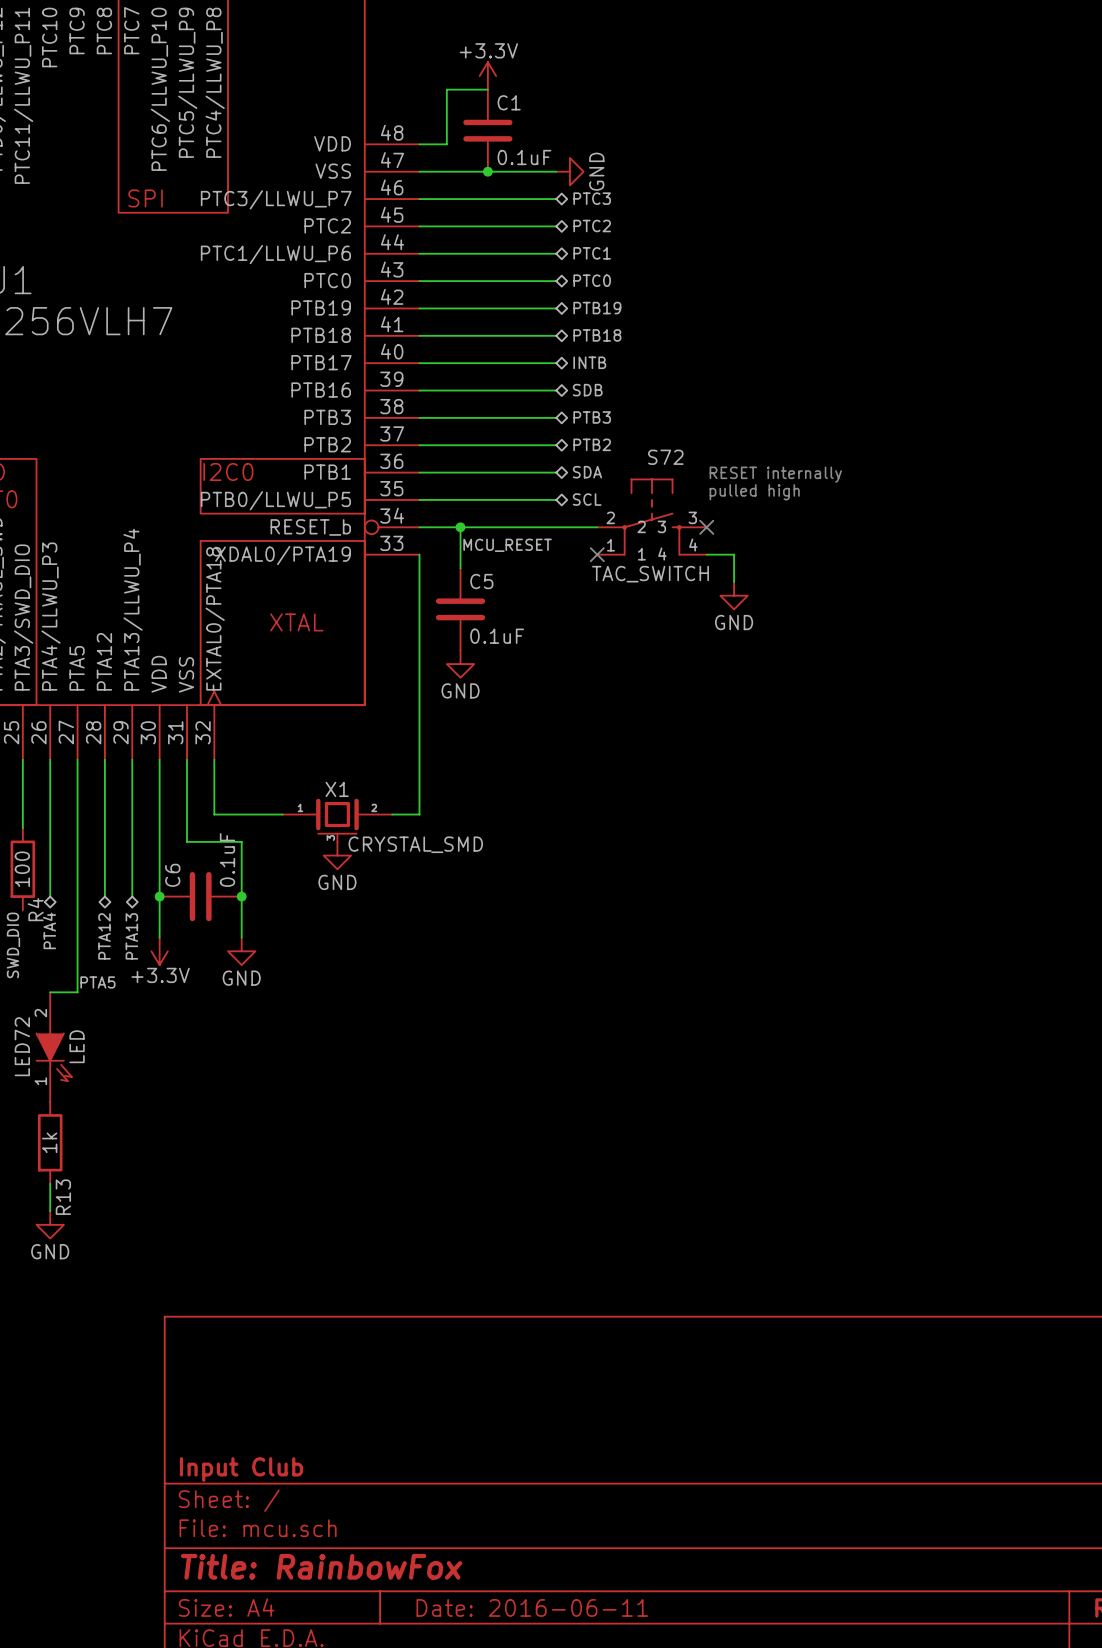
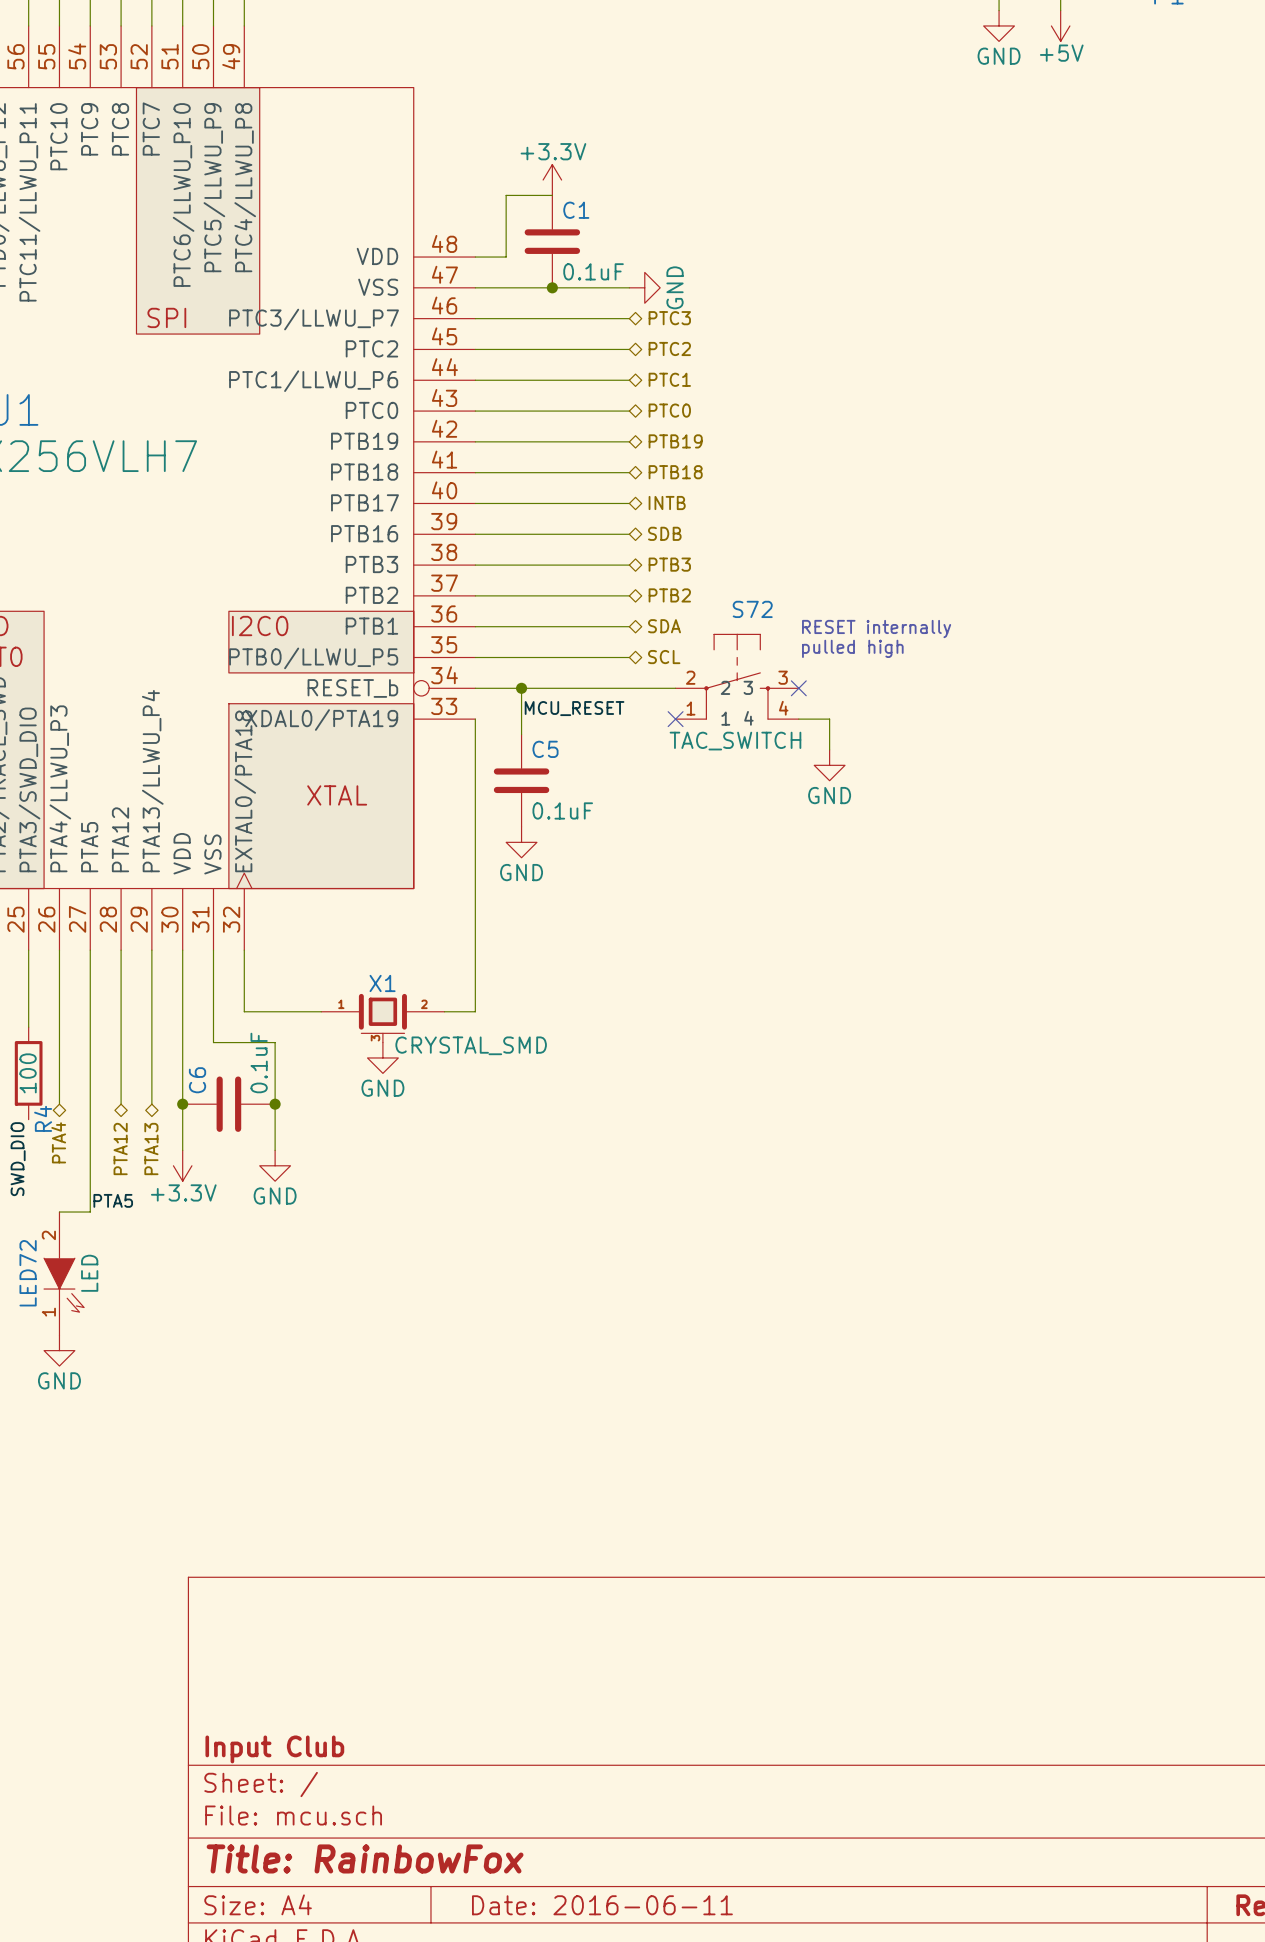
R13: 1k (50, 1142) -> none
wire: (50, 1183) (50, 1211) -> none
power symbol position: GND (50, 1224) -> GND (59, 1350)

